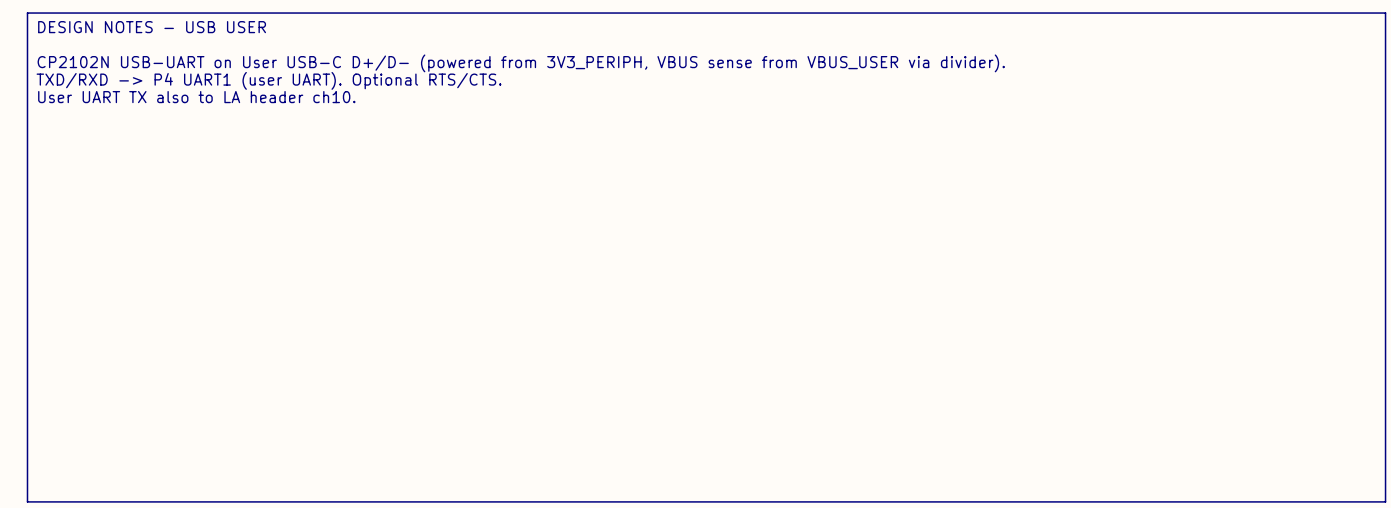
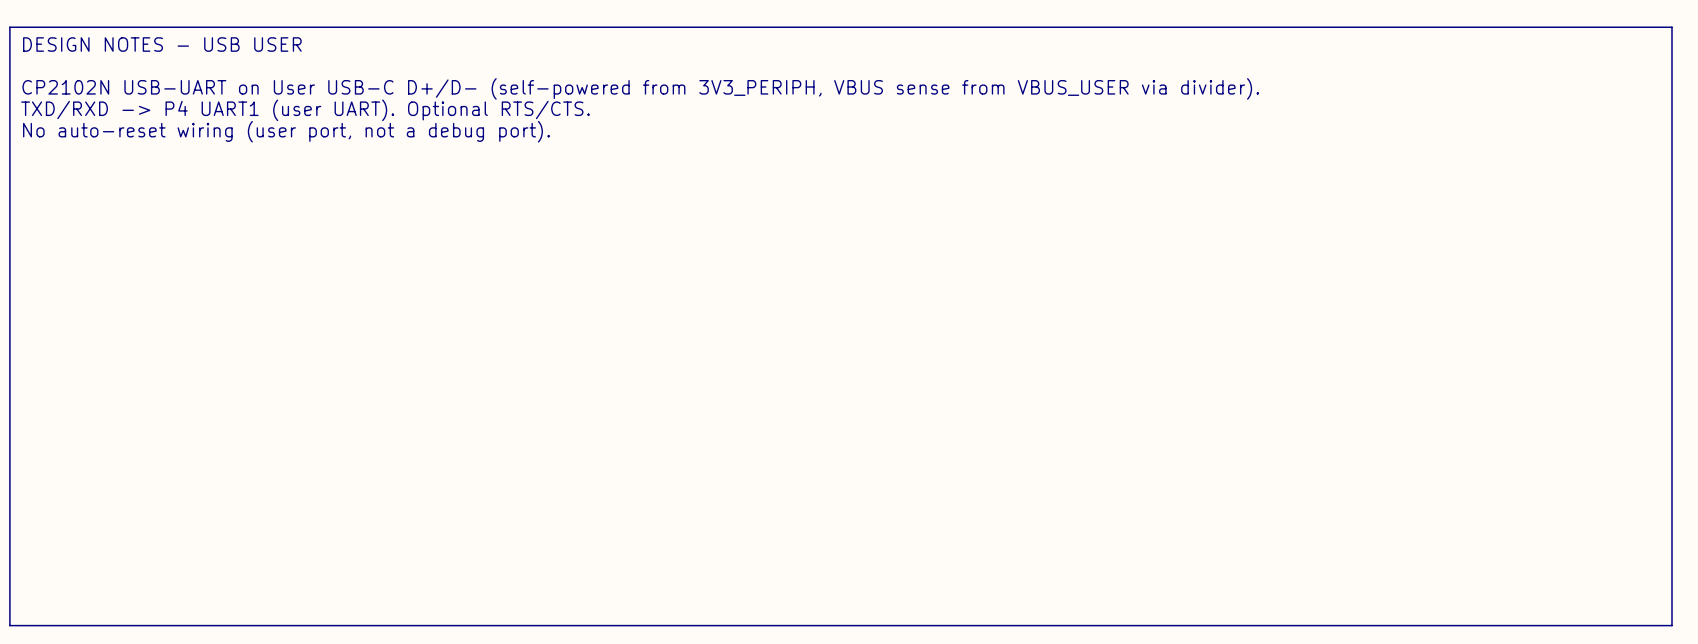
text: CP2102N USB-UART on User USB-C D+/D- (powered from 3V3_PERIPH, VBUS sense from VBUS_USER via divider). (521, 63) -> CP2102N USB-UART on User USB-C D+/D- (self-powered from 3V3_PERIPH, VBUS sense from VBUS_USER via divider). (640, 88)
text: User UART TX also to LA header ch10. (196, 97) -> No auto-reset wiring (user port, not a debug port). (286, 131)

